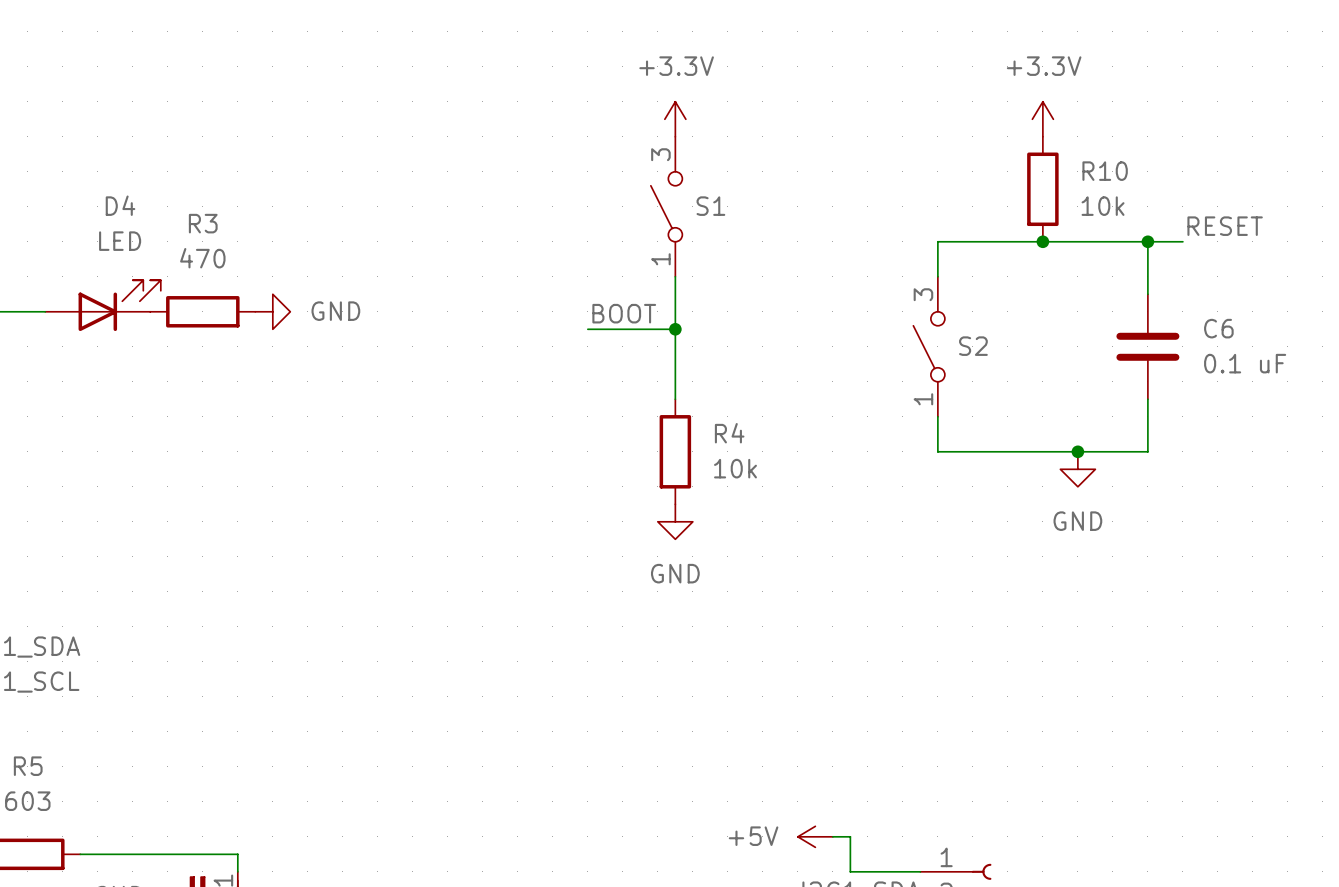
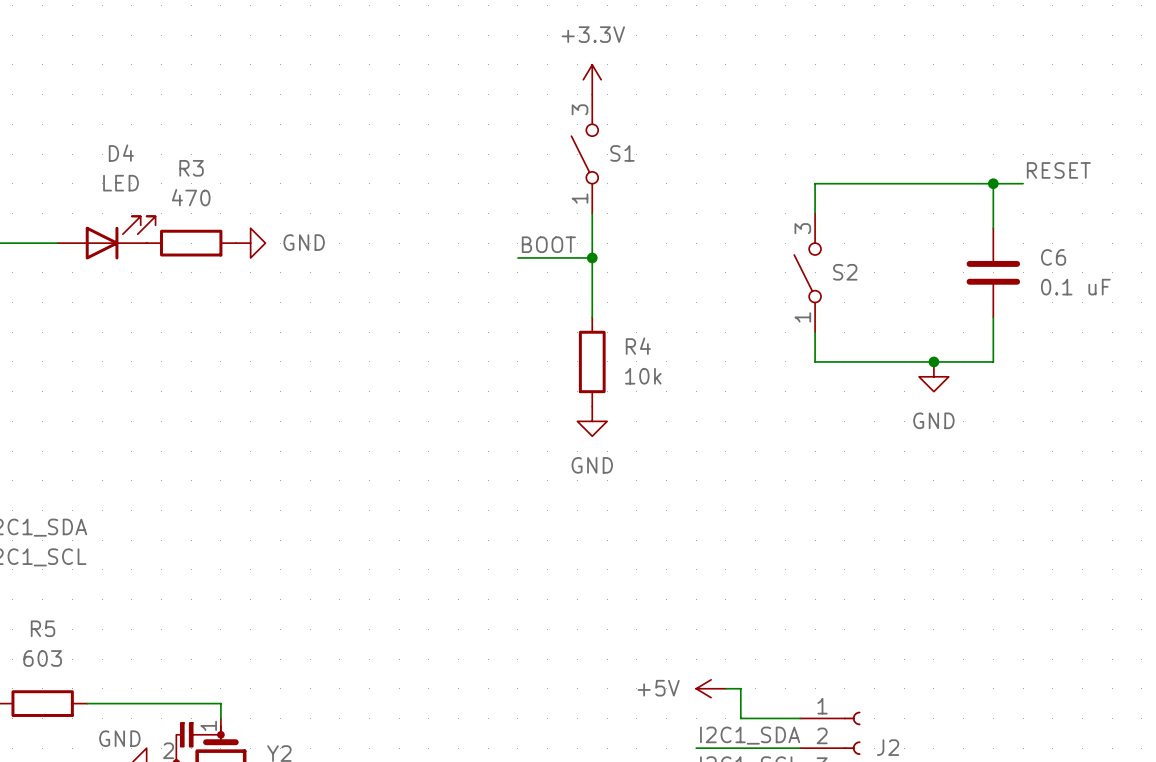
power symbol: +3.3V (1042, 119) -> none
R10: 10k (1042, 189) -> none
junction: (1042, 241) -> none

